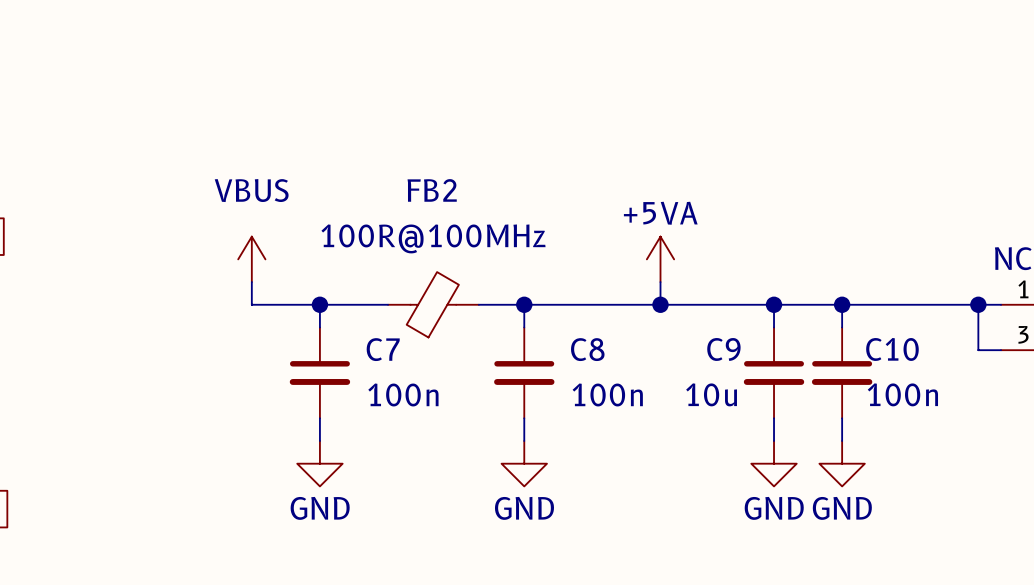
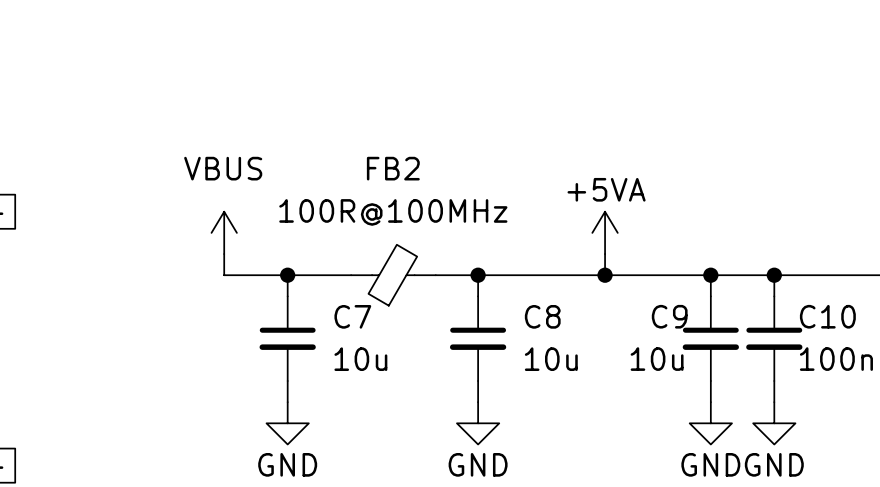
C7 value: 100n (403, 394) -> 10u (360, 359)
C8 value: 100n (607, 394) -> 10u (551, 359)

